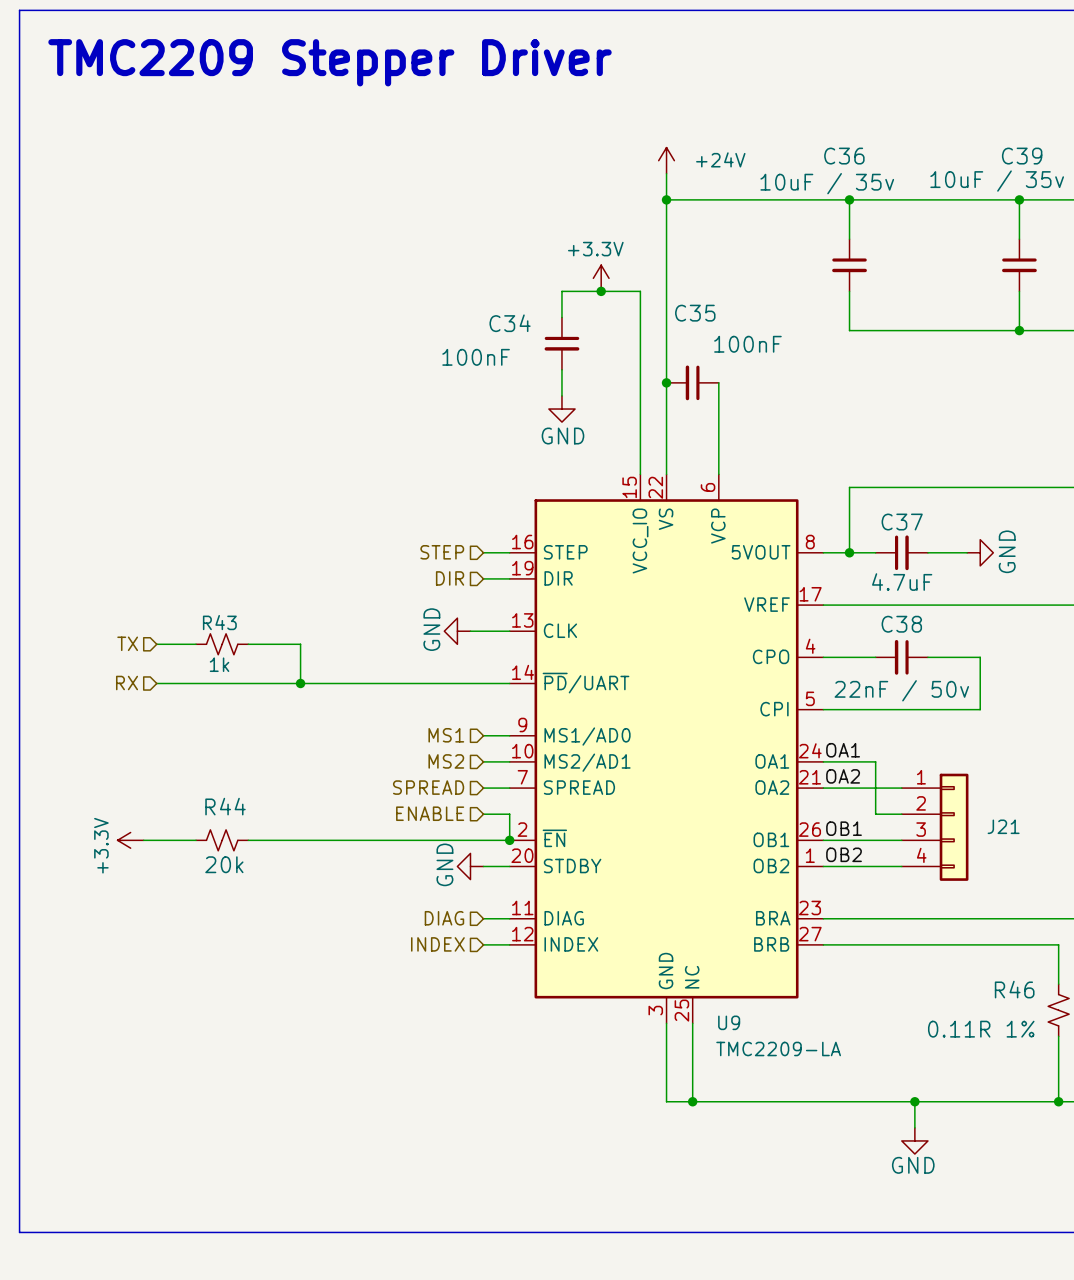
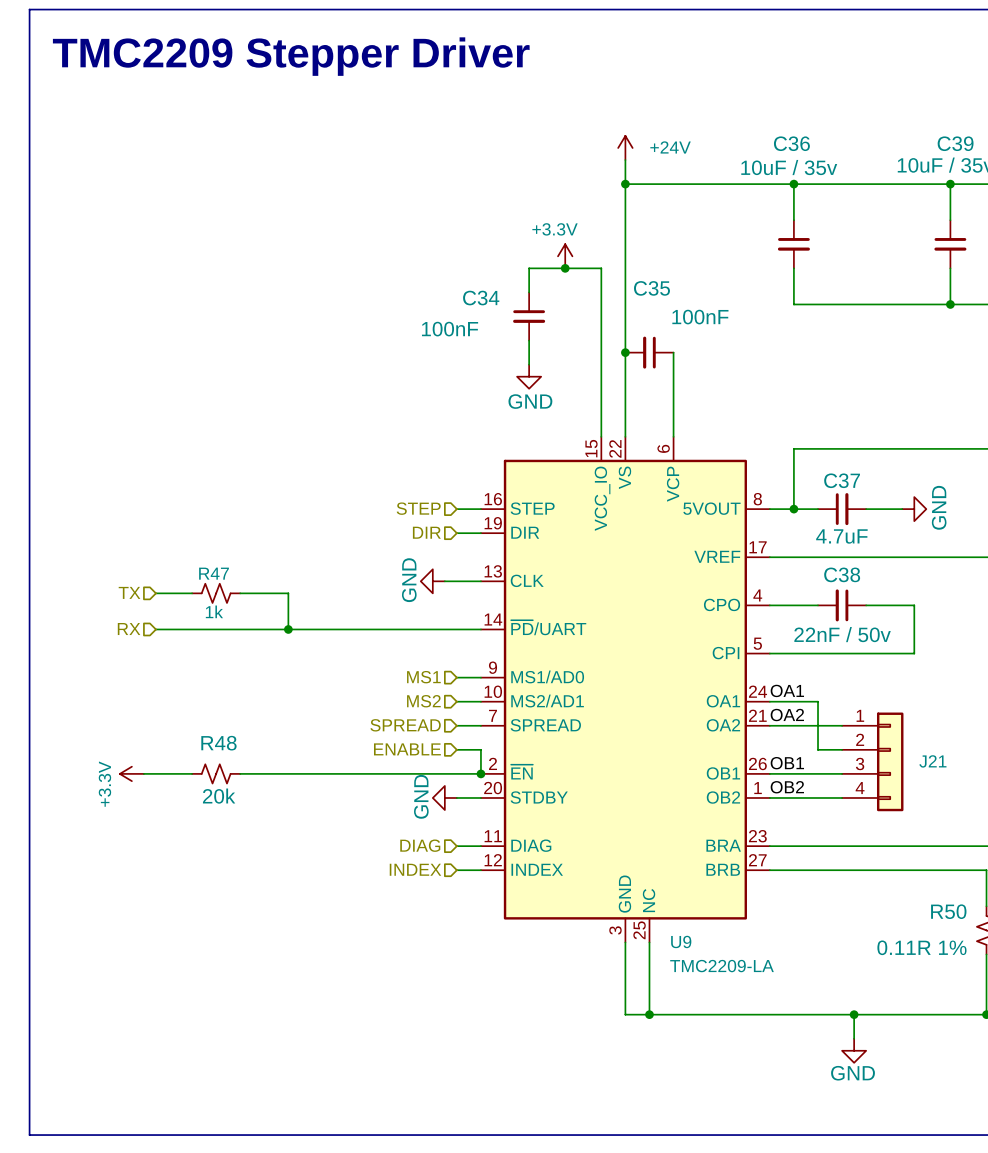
R43 name: R43 (219, 622) -> R47 (214, 573)
R44 name: R44 (225, 806) -> R48 (218, 743)
R46 name: R46 (1014, 989) -> R50 (948, 911)

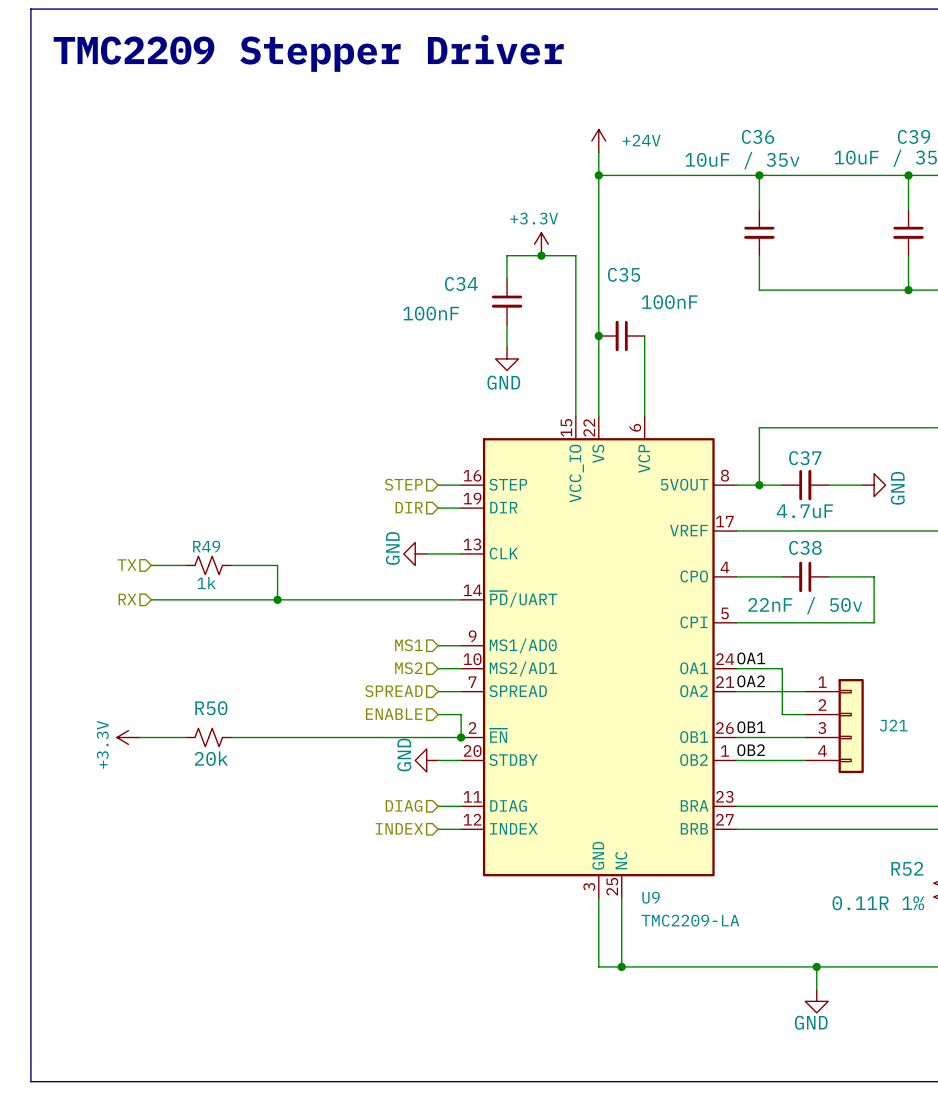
R47 name: R47 (214, 573) -> R49 (206, 546)
R48 name: R48 (218, 743) -> R50 (211, 708)
R50 name: R50 (948, 911) -> R52 (907, 868)

